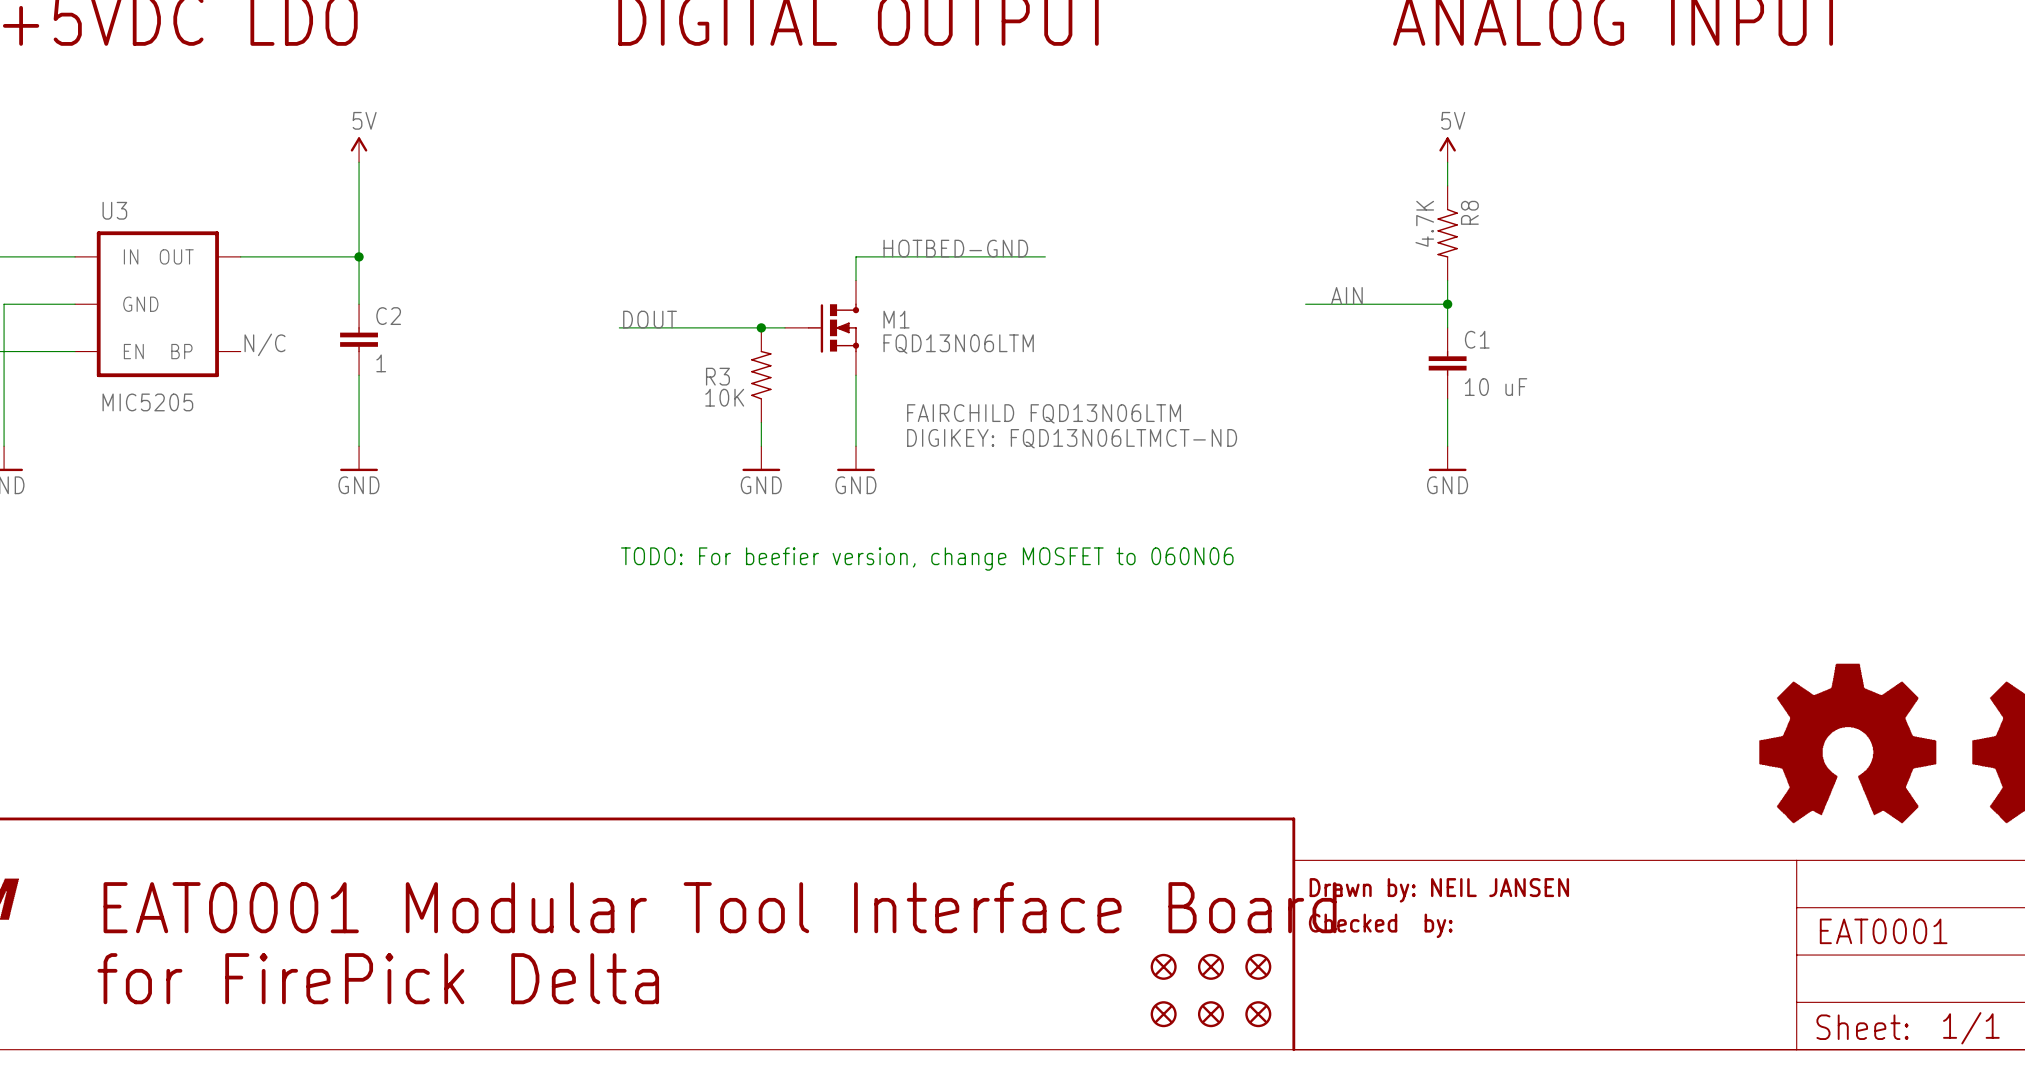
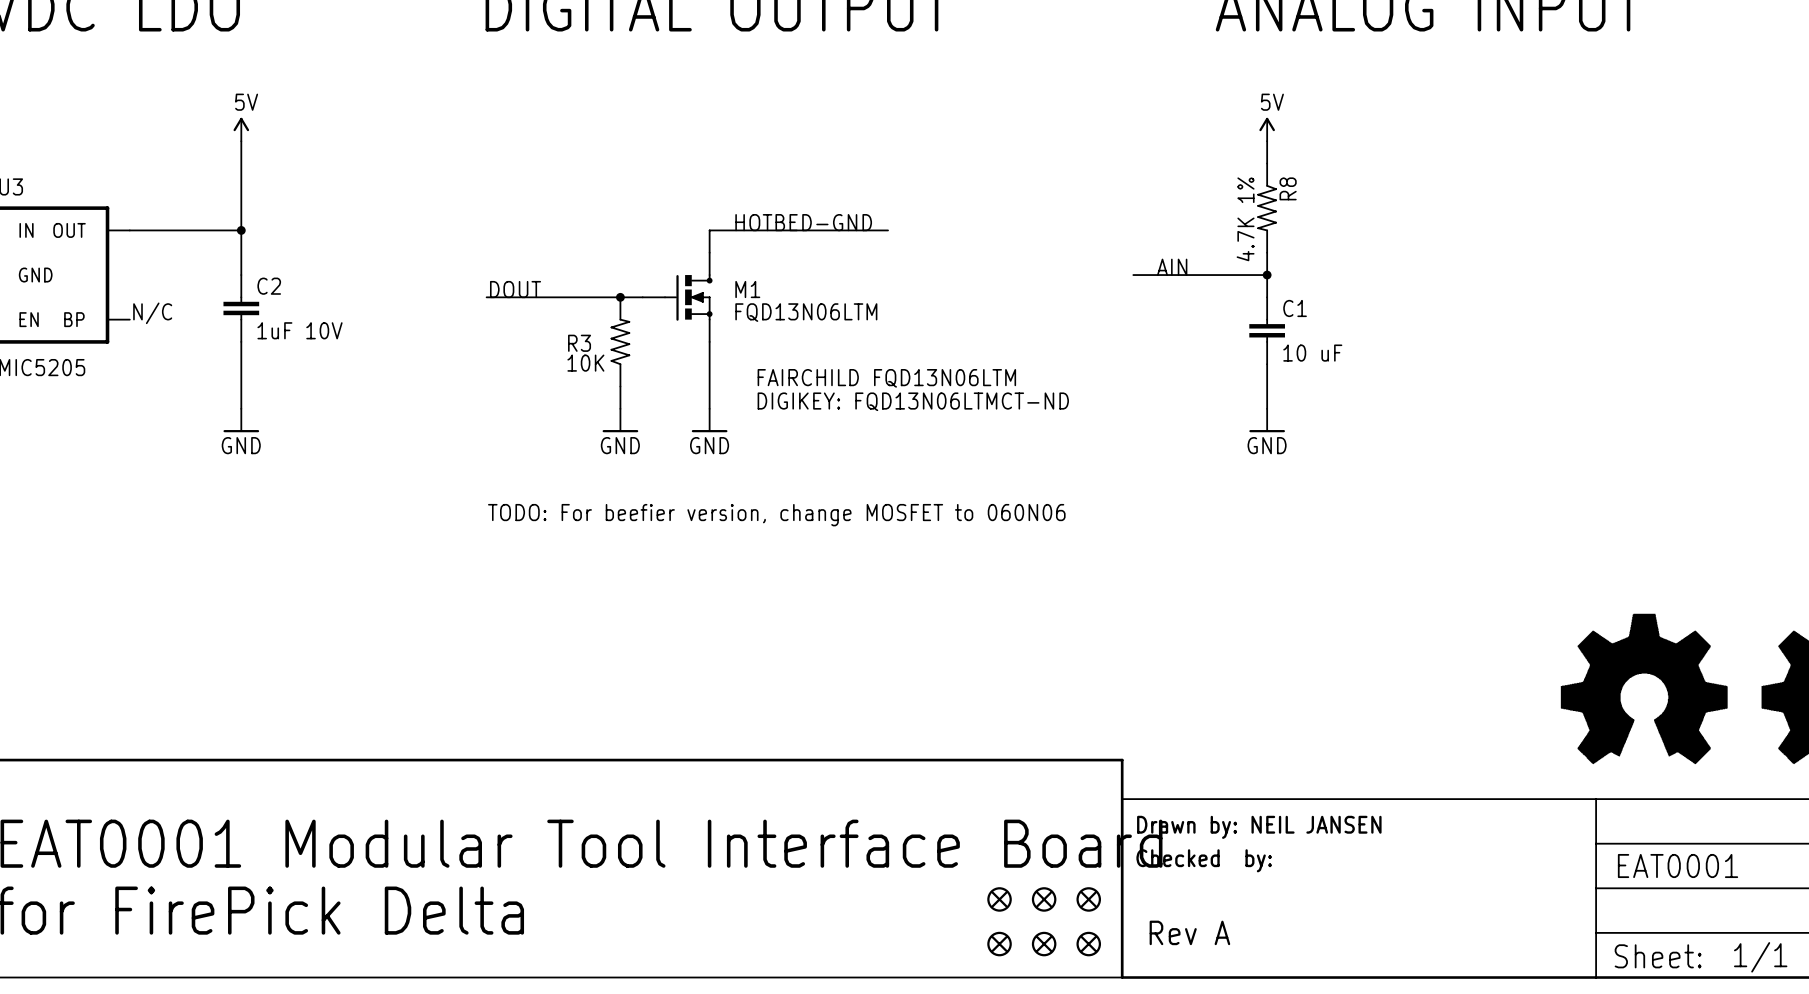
R8 value: 4.7K (1424, 223) -> 4.7K 1% (1245, 219)
C2 value: 1 (381, 363) -> 1uF 10V (300, 330)
text: none -> Rev A (1189, 932)

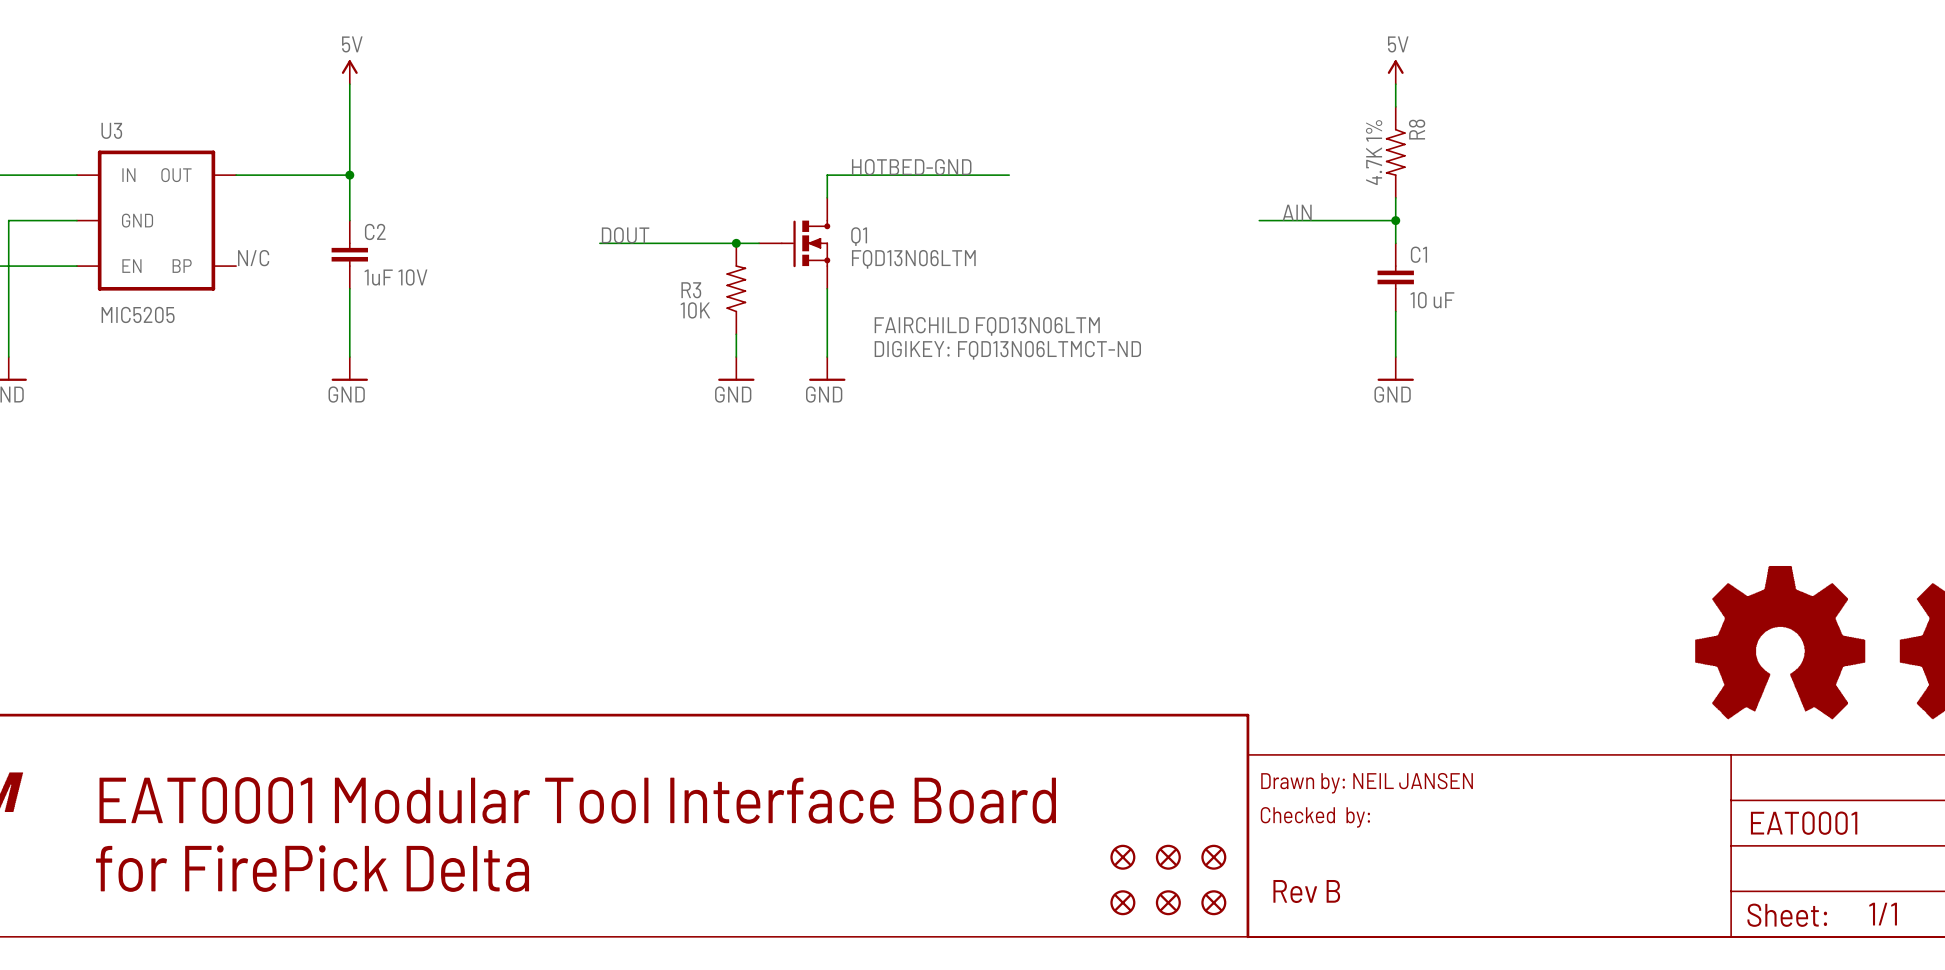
M1 name: M1 (747, 289) -> Q1 (859, 236)
text: TODO: For beefier version, change MOSFET to 060N06 (776, 515) -> none
text: Rev A (1189, 932) -> Rev B (1306, 891)

